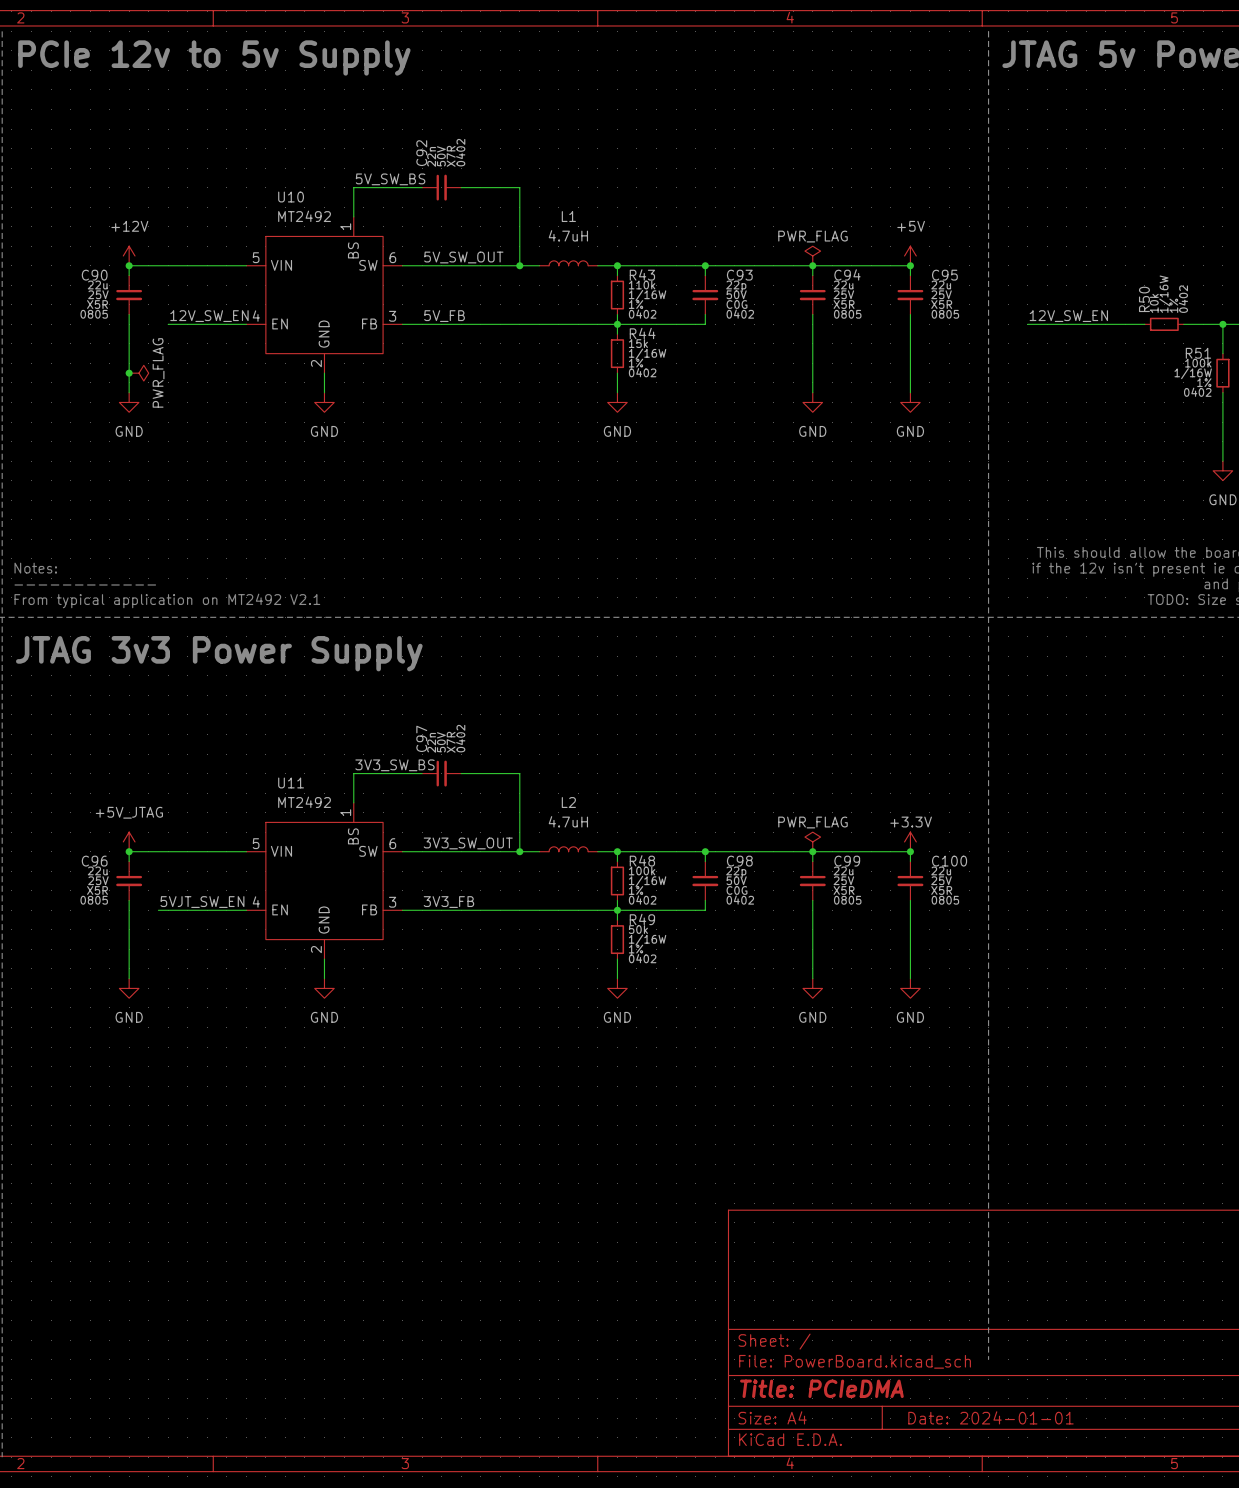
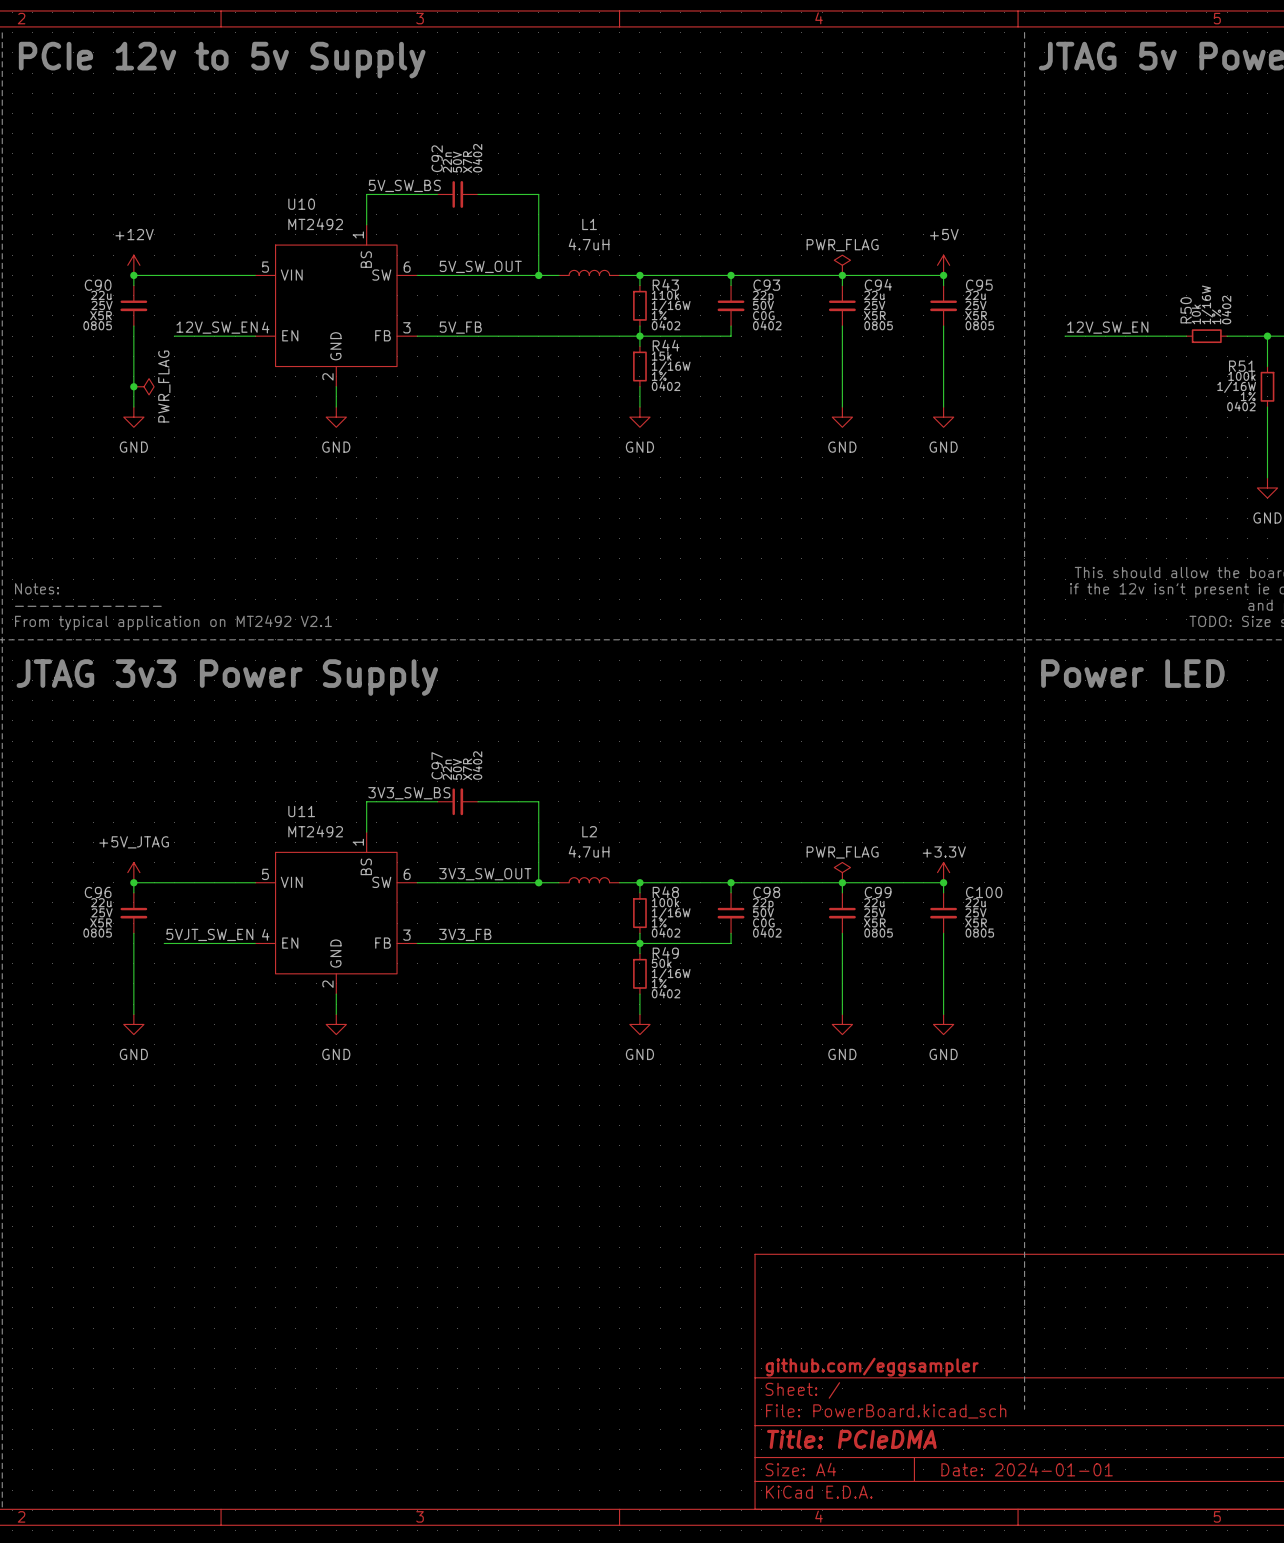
text: none -> Power LED (1132, 673)
title block: none -> github.com/eggsampler (872, 1367)

